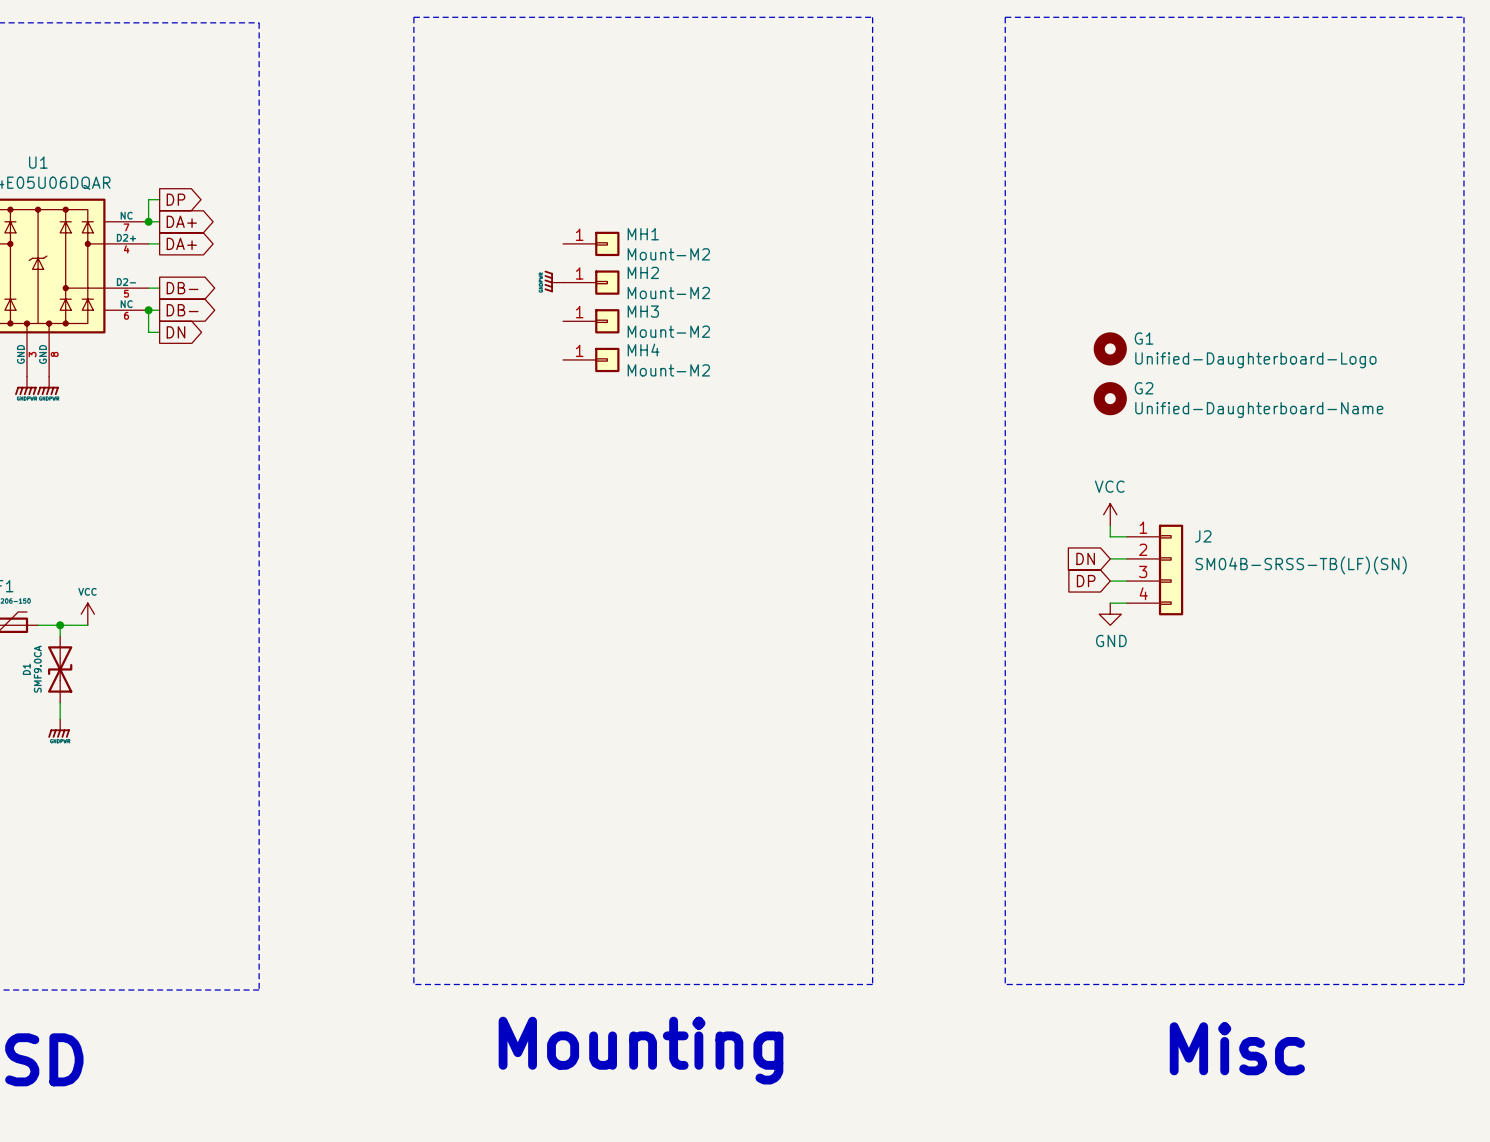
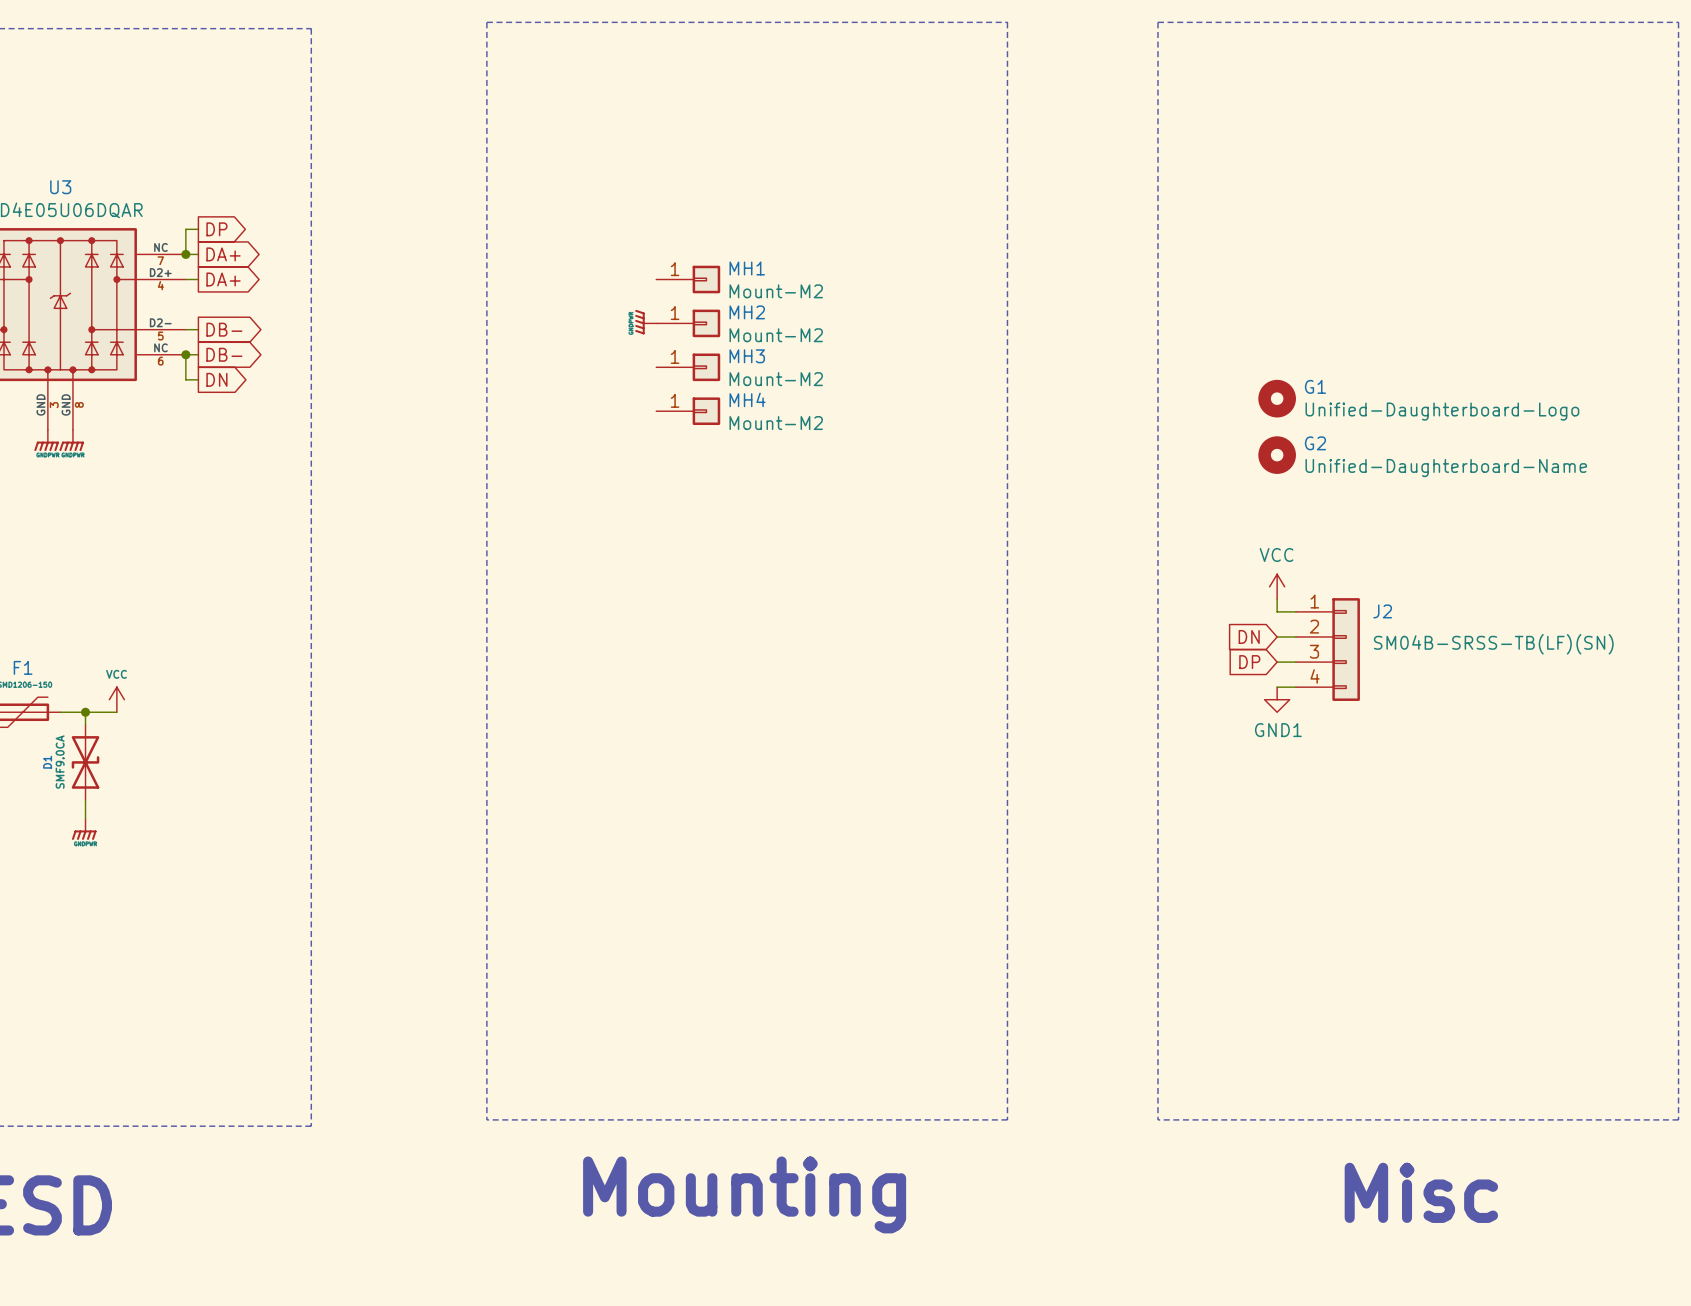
U1 name: U1 (38, 162) -> U3 (60, 187)
power symbol: GND (1110, 614) -> GND1 (1277, 699)

